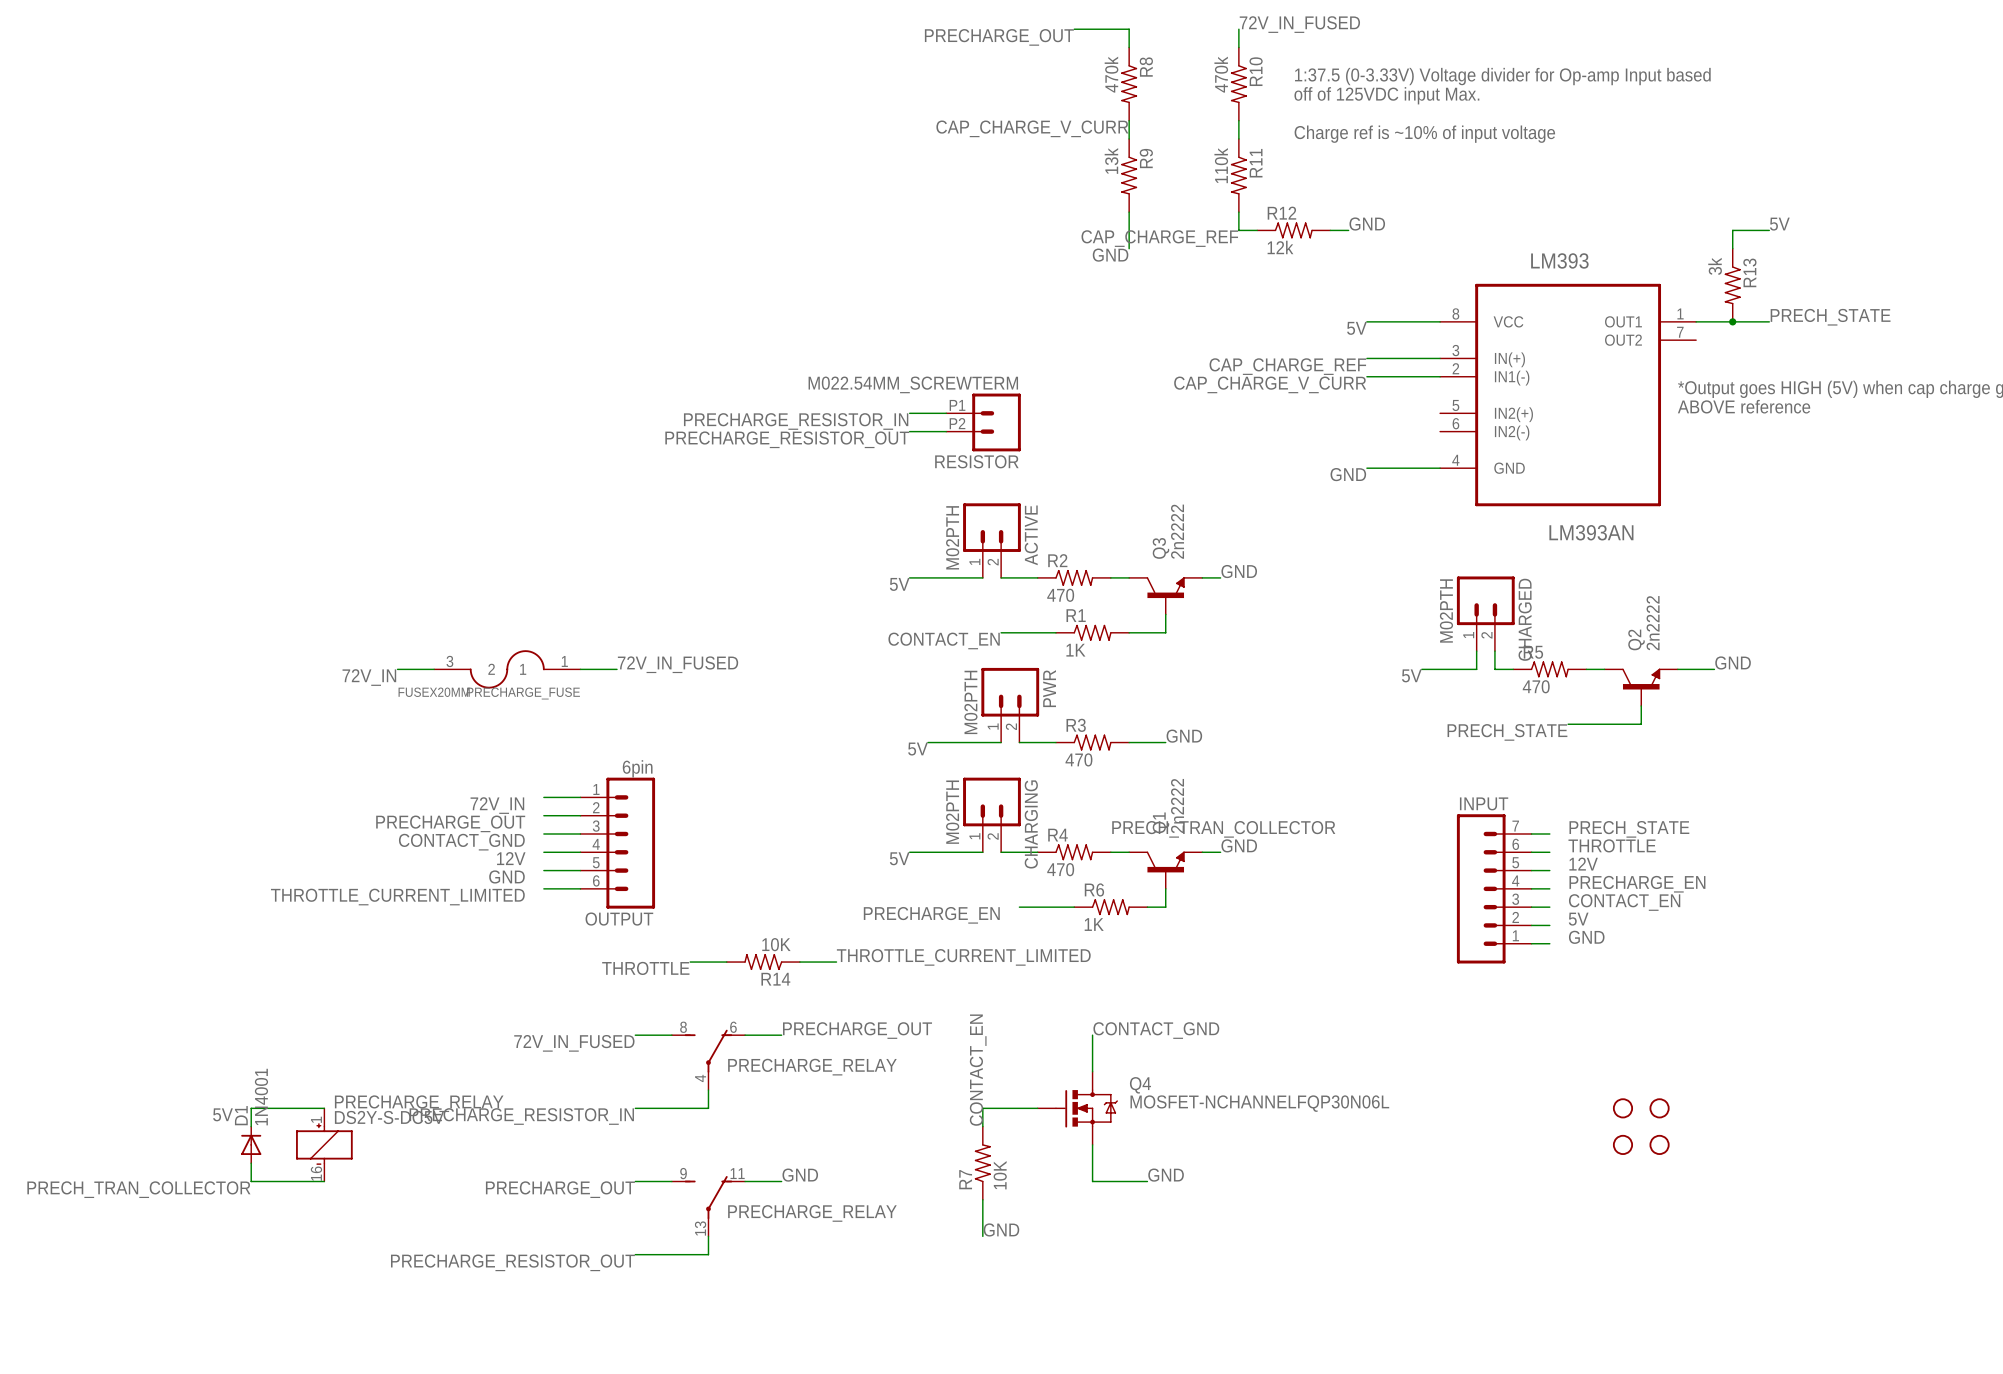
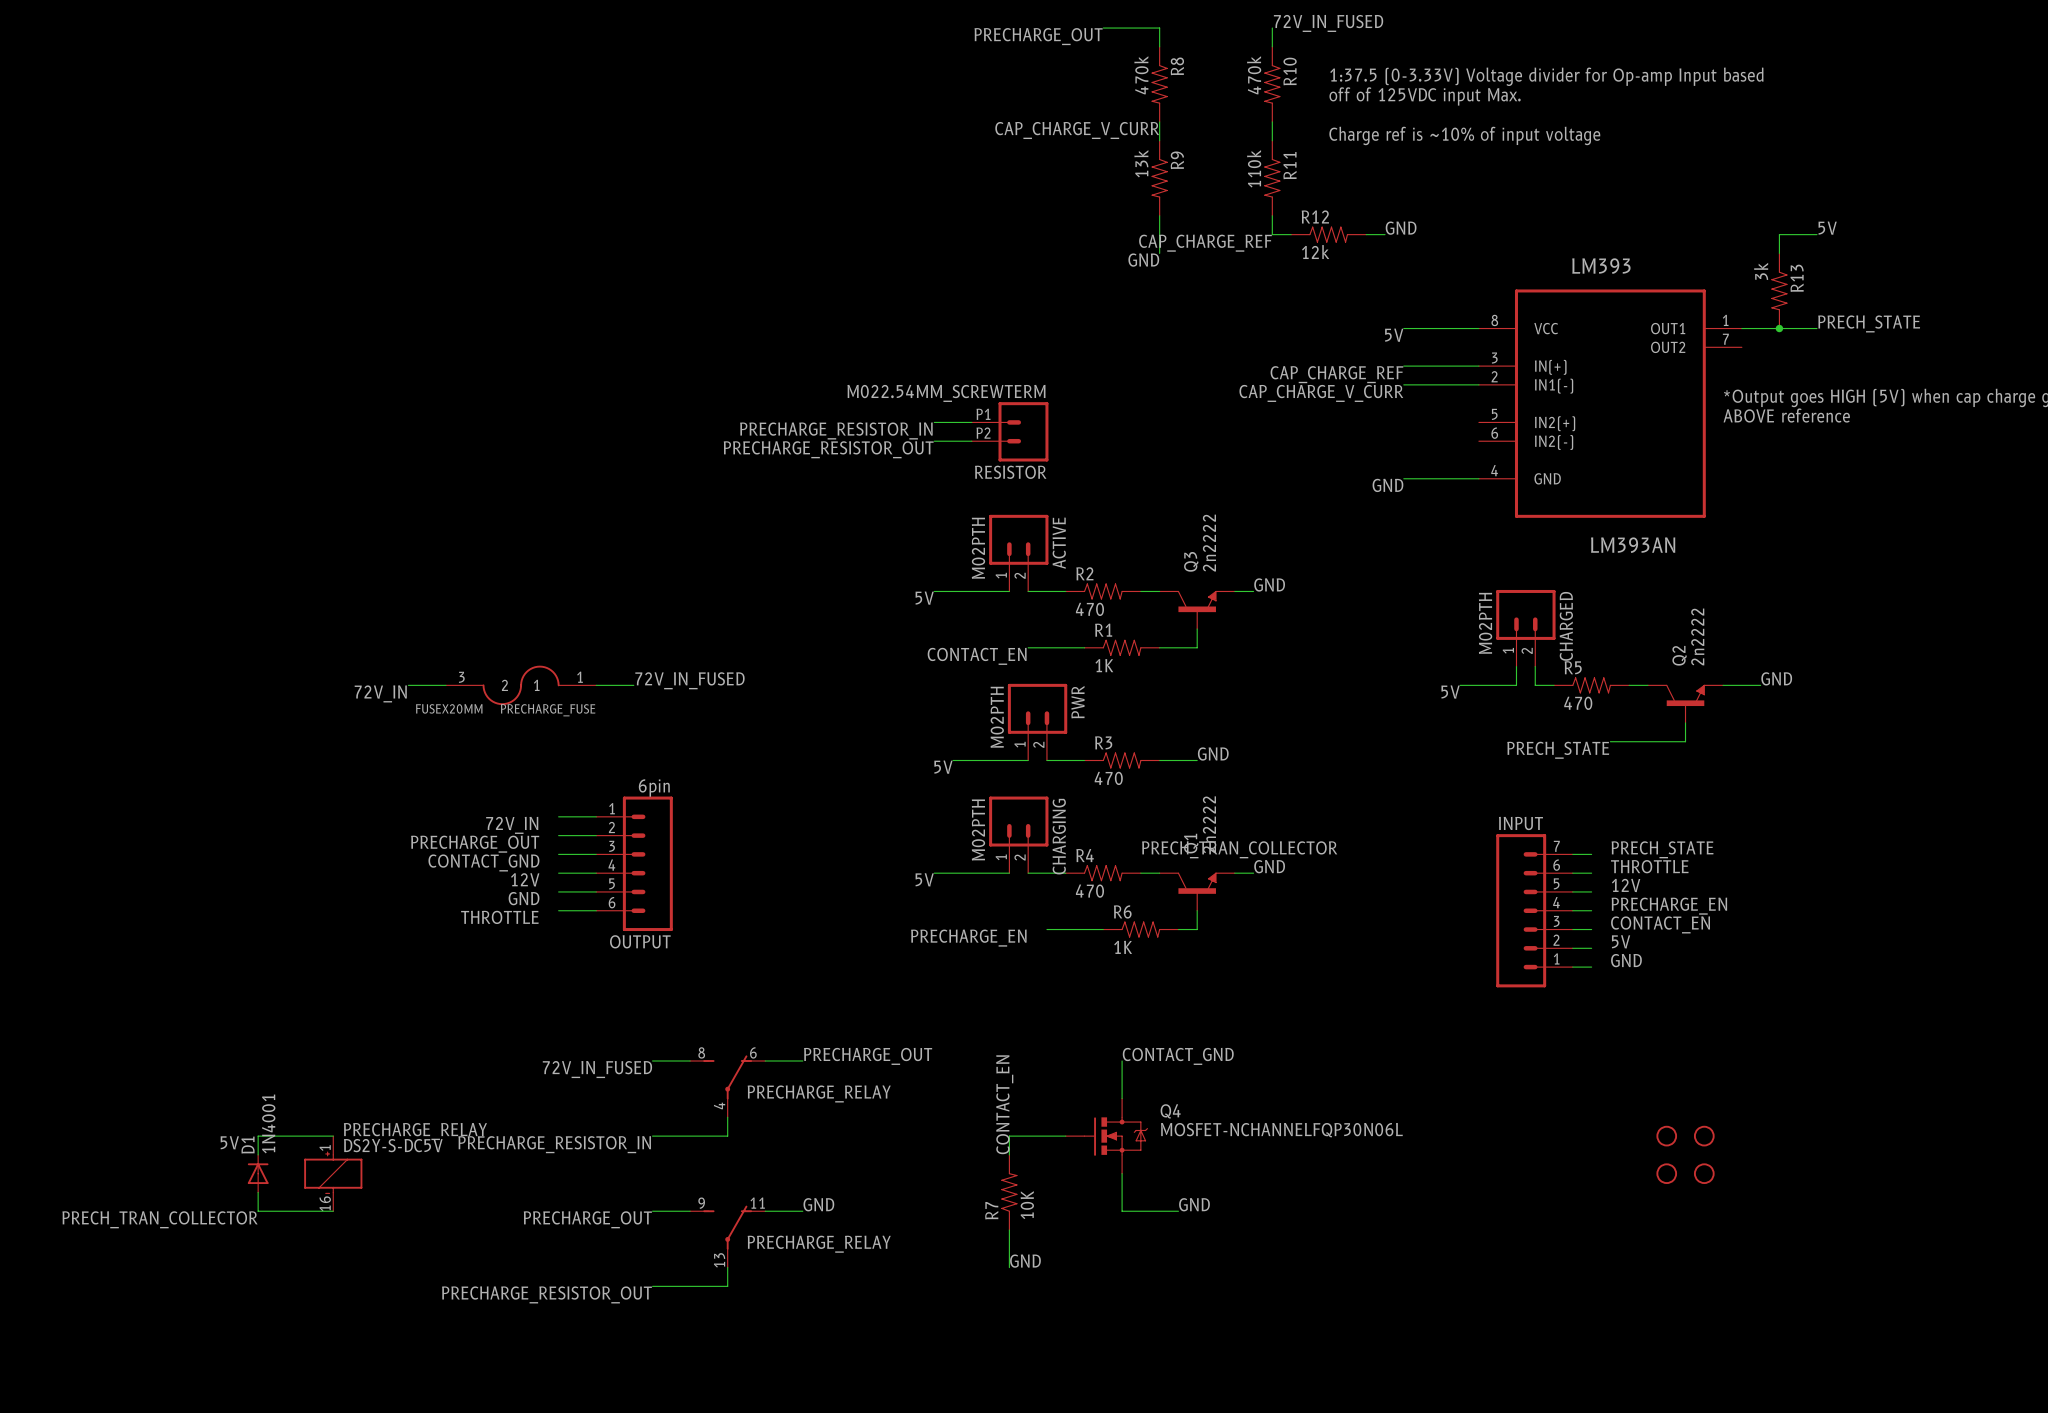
label: THROTTLE_CURRENT_LIMITED (397, 897) -> THROTTLE (499, 917)
label: THROTTLE_CURRENT_LIMITED (963, 957) -> none
wire: (690, 962) (726, 962) -> none
R14: 10K (763, 962) -> none
wire: (799, 962) (836, 962) -> none
label: THROTTLE (645, 968) -> none

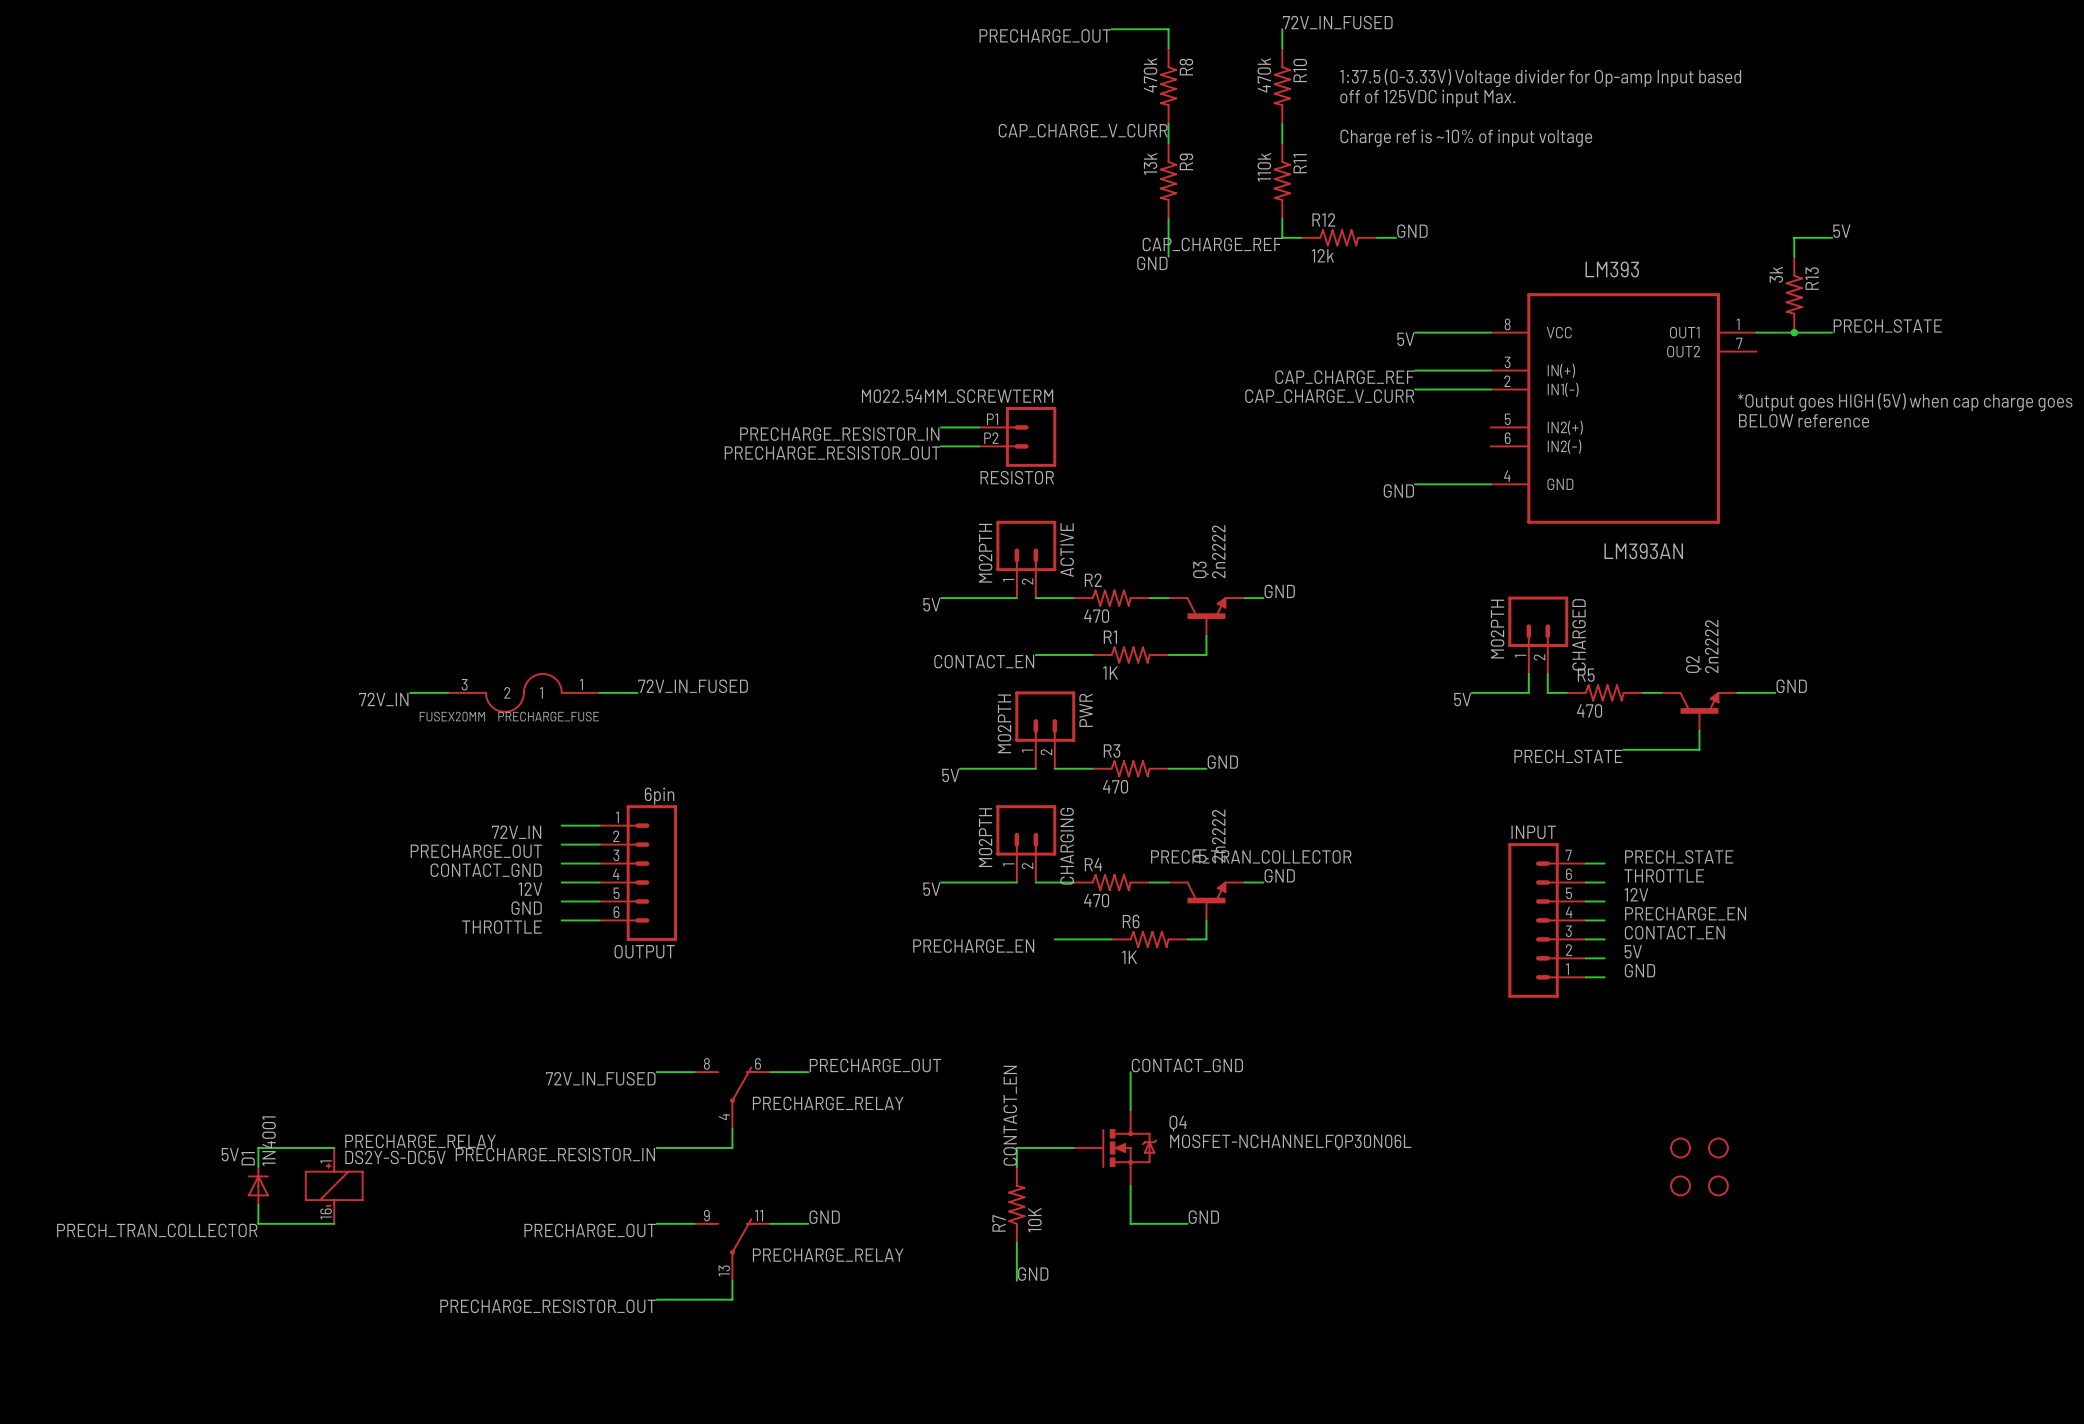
text: ABOVE reference (1786, 415) -> BELOW reference (1804, 420)

